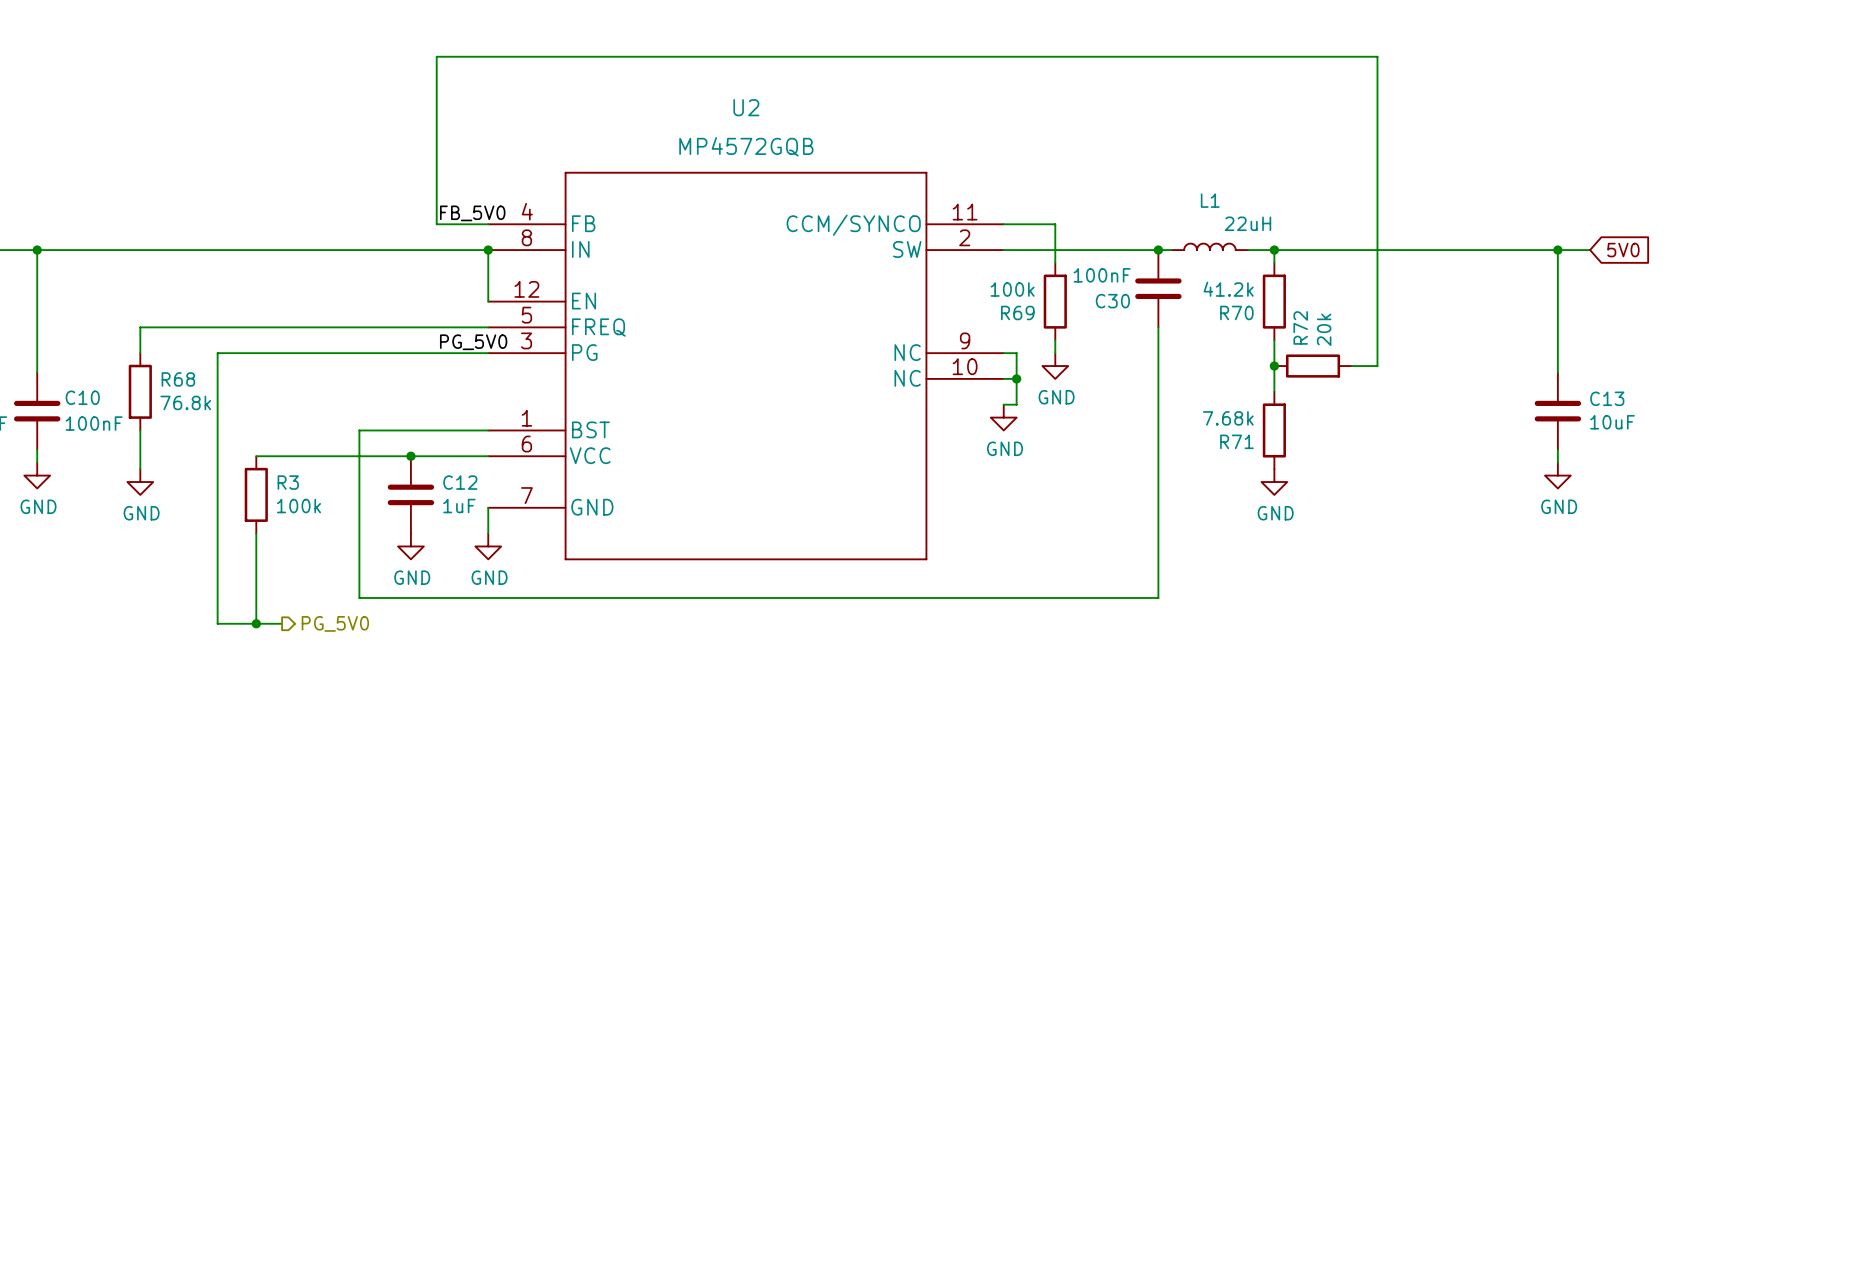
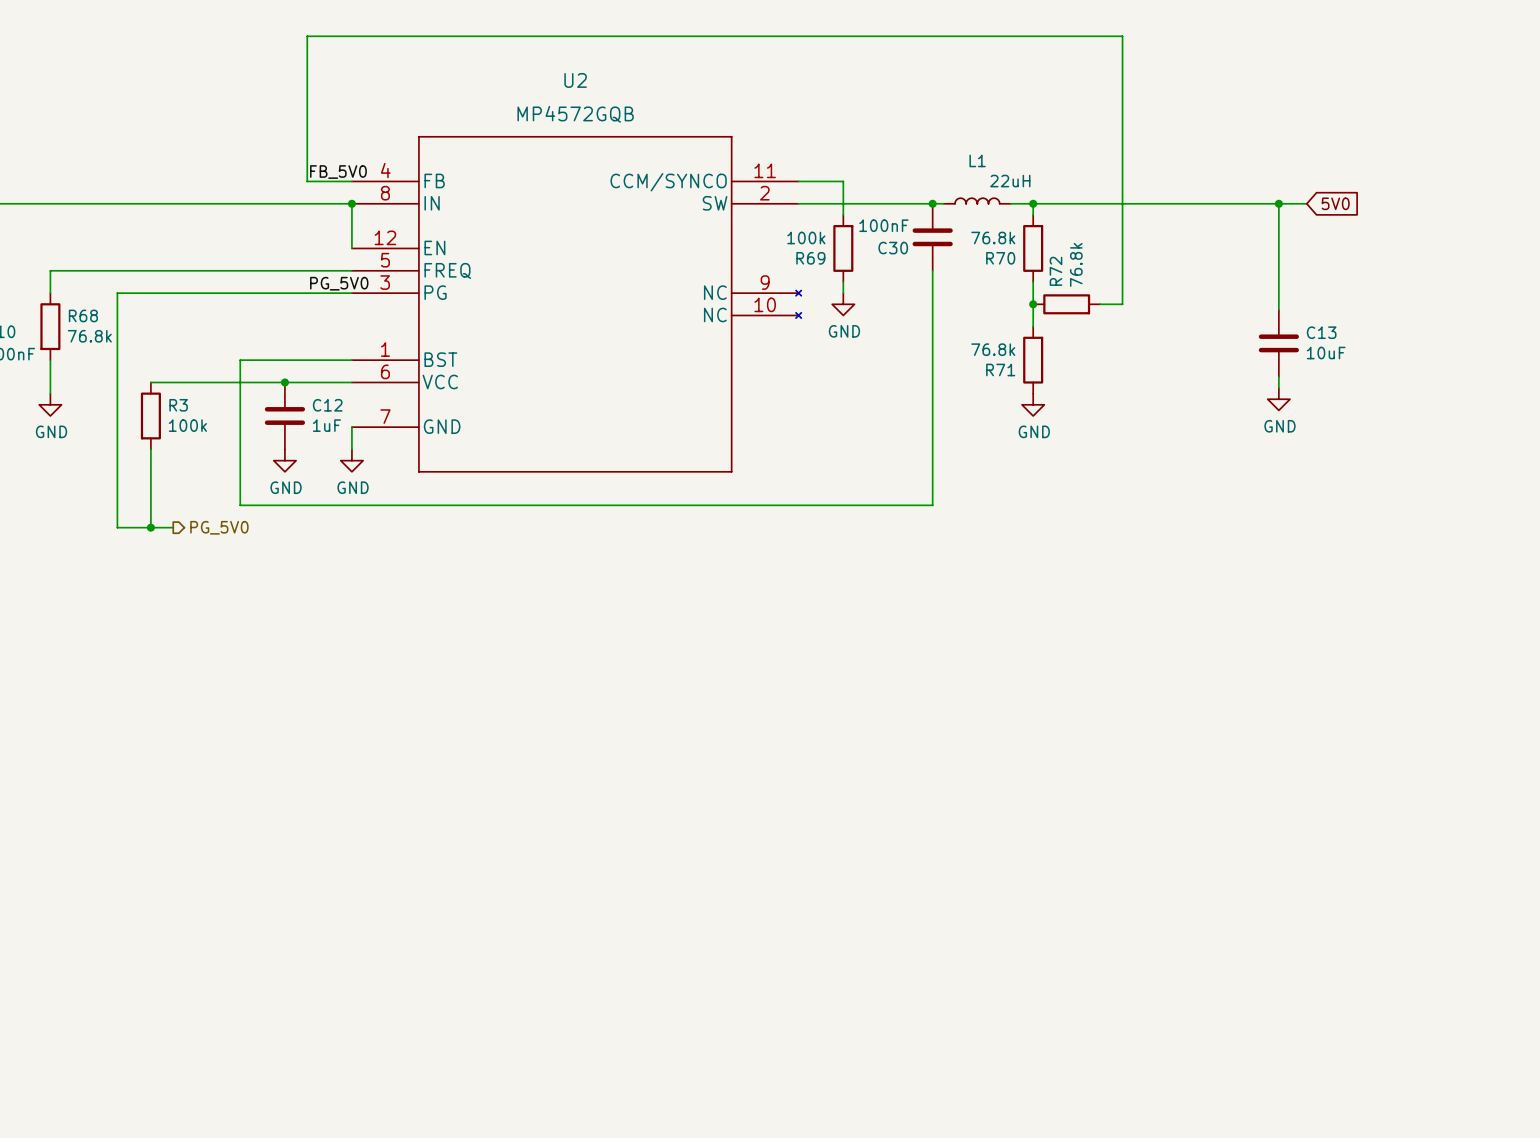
U2 symbol: [488, 172, 1004, 560] -> [351, 136, 802, 473]
R70 value: 41.2k (1228, 289) -> 76.8k (993, 237)
R72 value: 20k (1324, 329) -> 76.8k (1076, 264)
wire: (1003, 353) (1016, 353) (1016, 404) (1003, 404) -> none
wire: (1003, 378) (1016, 378) -> none
junction: (1016, 378) -> none
power symbol: GND (1003, 417) -> none
R71 value: 7.68k (1228, 418) -> 76.8k (993, 349)

